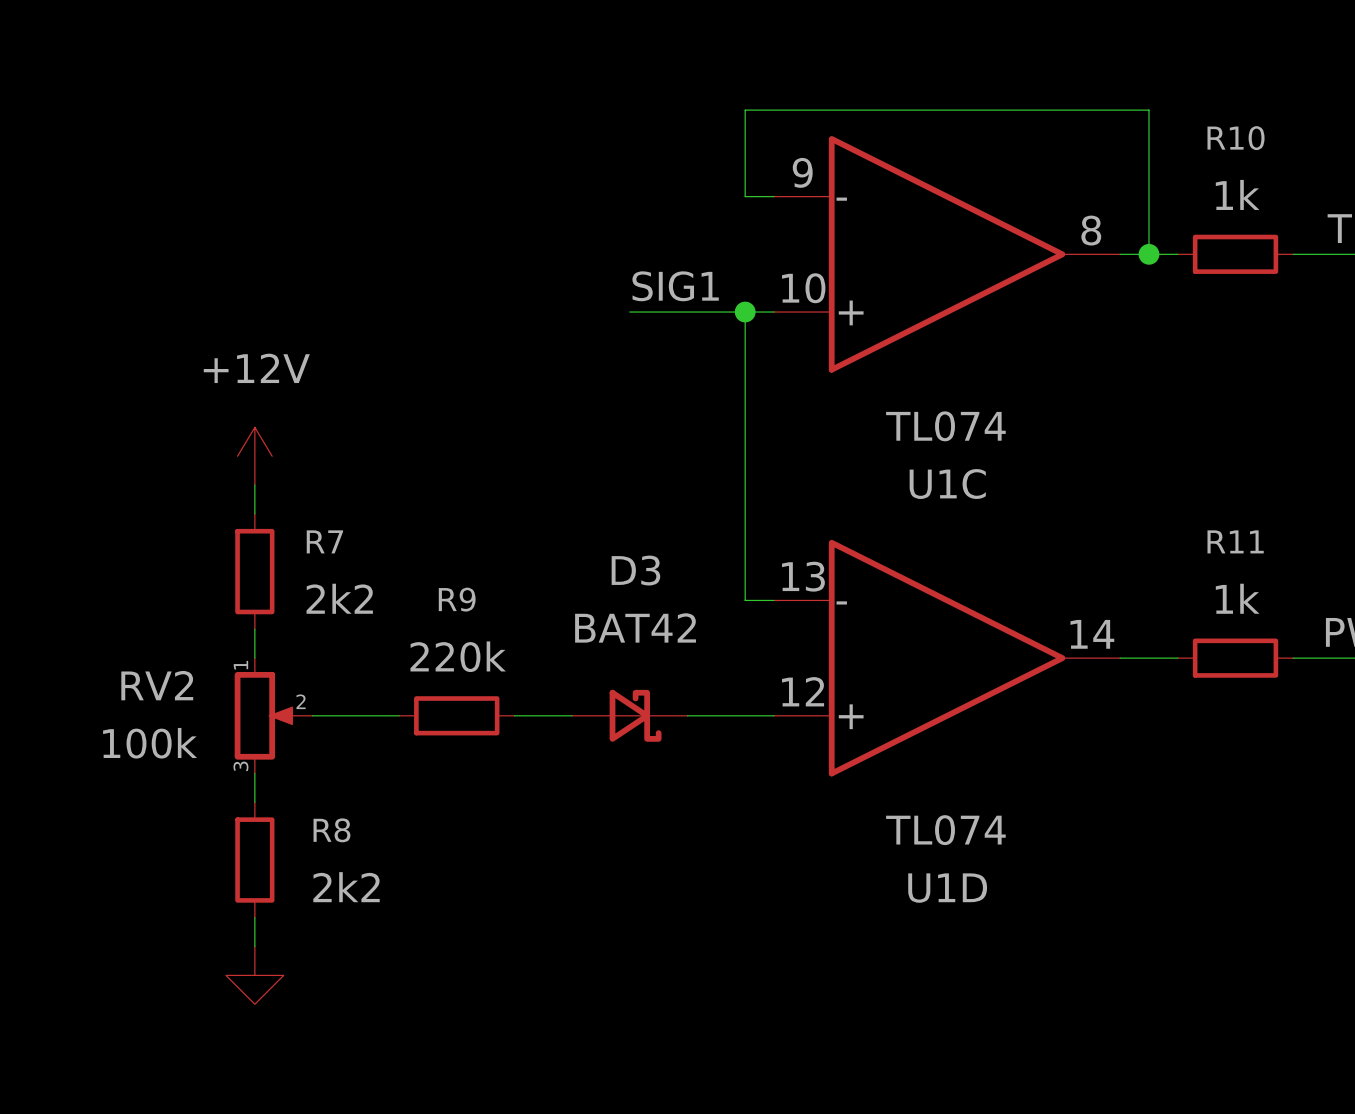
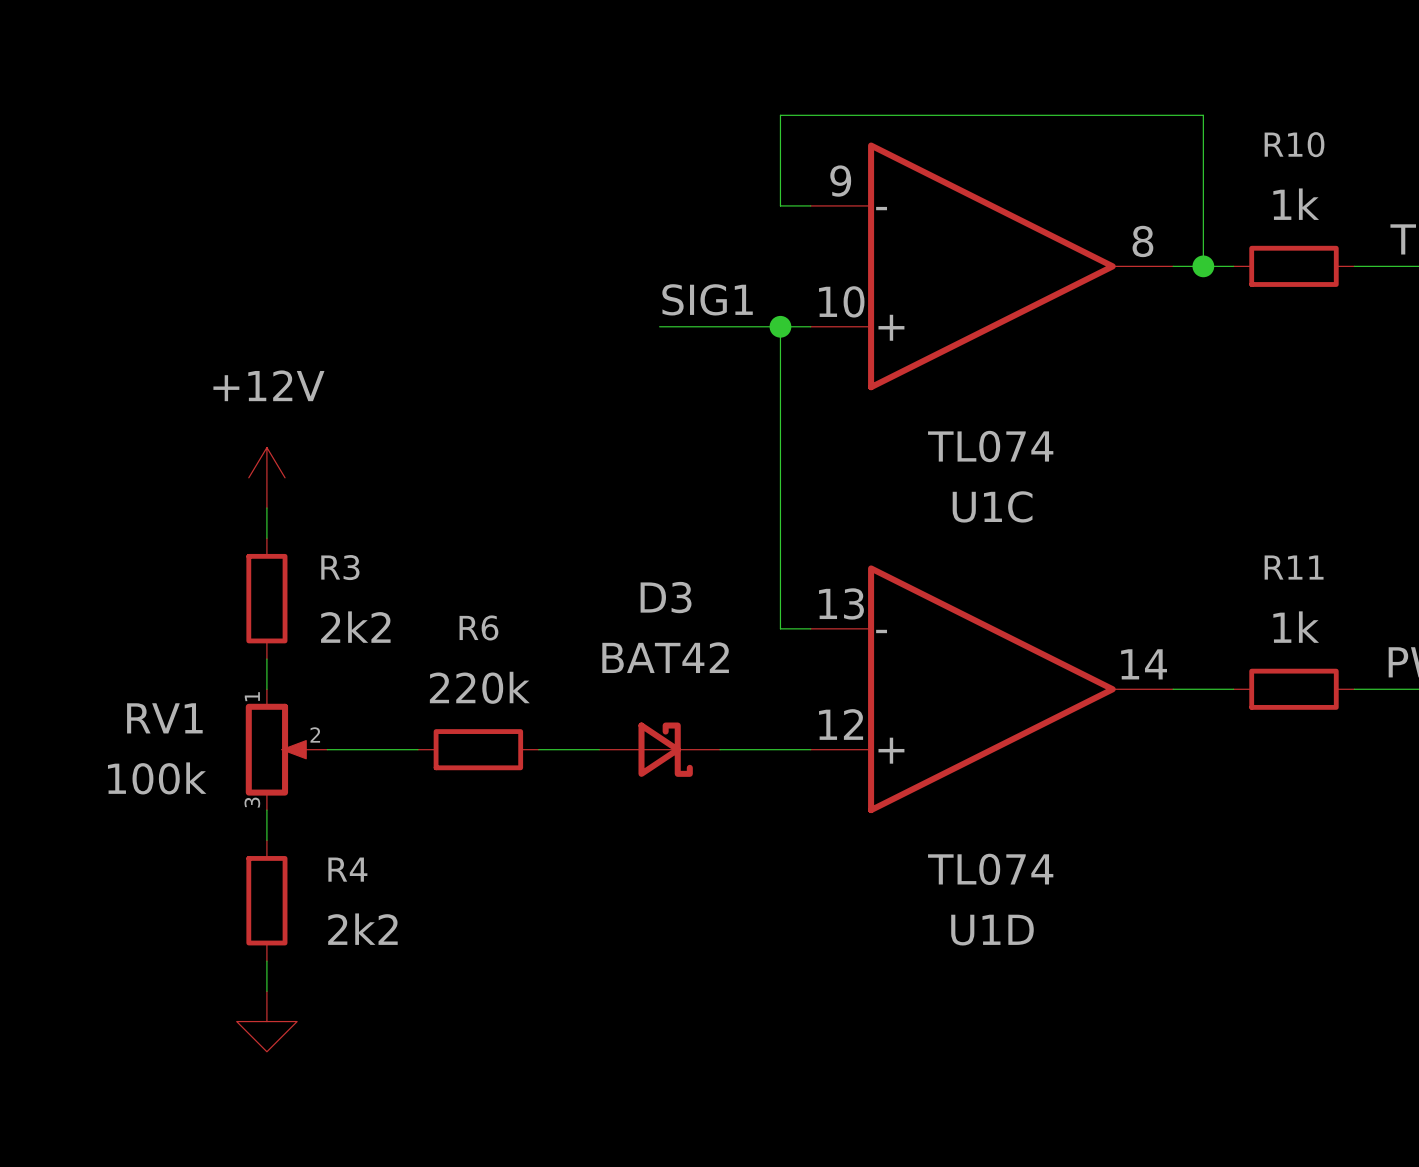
R7 name: R7 (324, 541) -> R3 (340, 567)
R9 name: R9 (457, 599) -> R6 (478, 627)
RV2 name: RV2 (157, 685) -> RV1 (164, 718)
R8 name: R8 (331, 830) -> R4 (347, 869)

